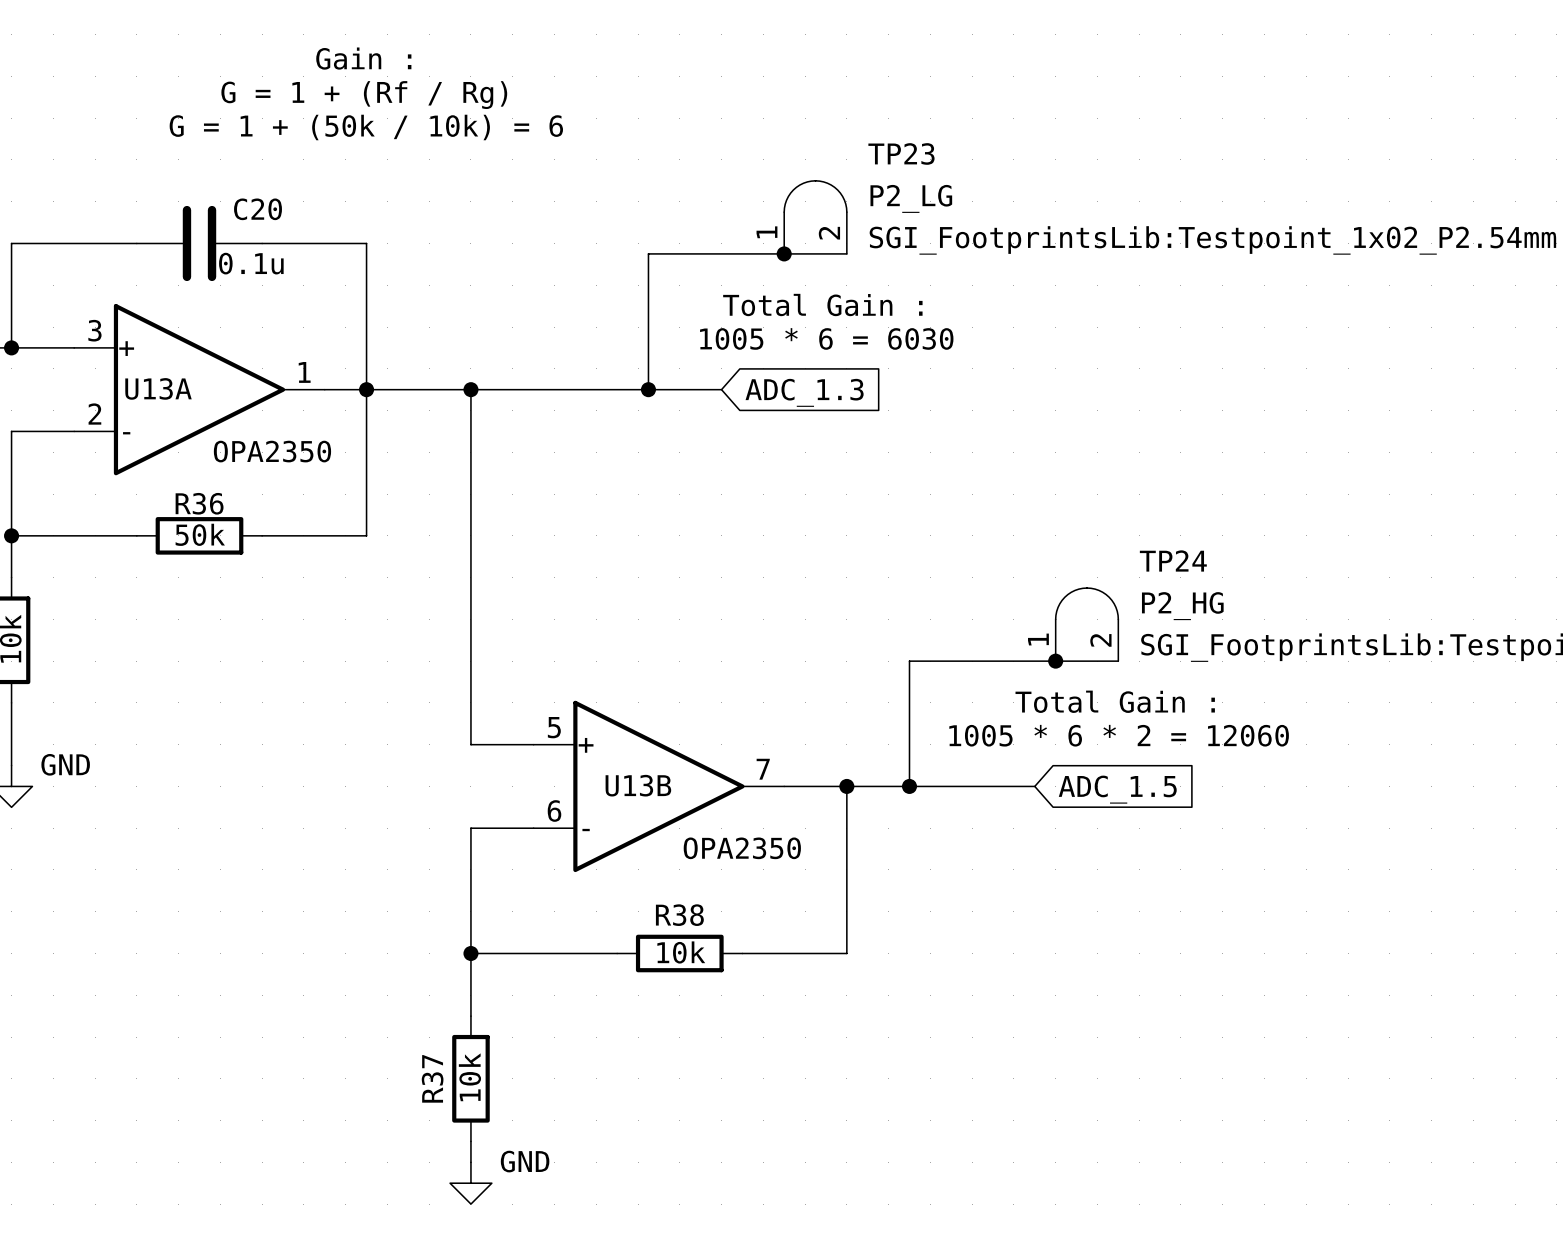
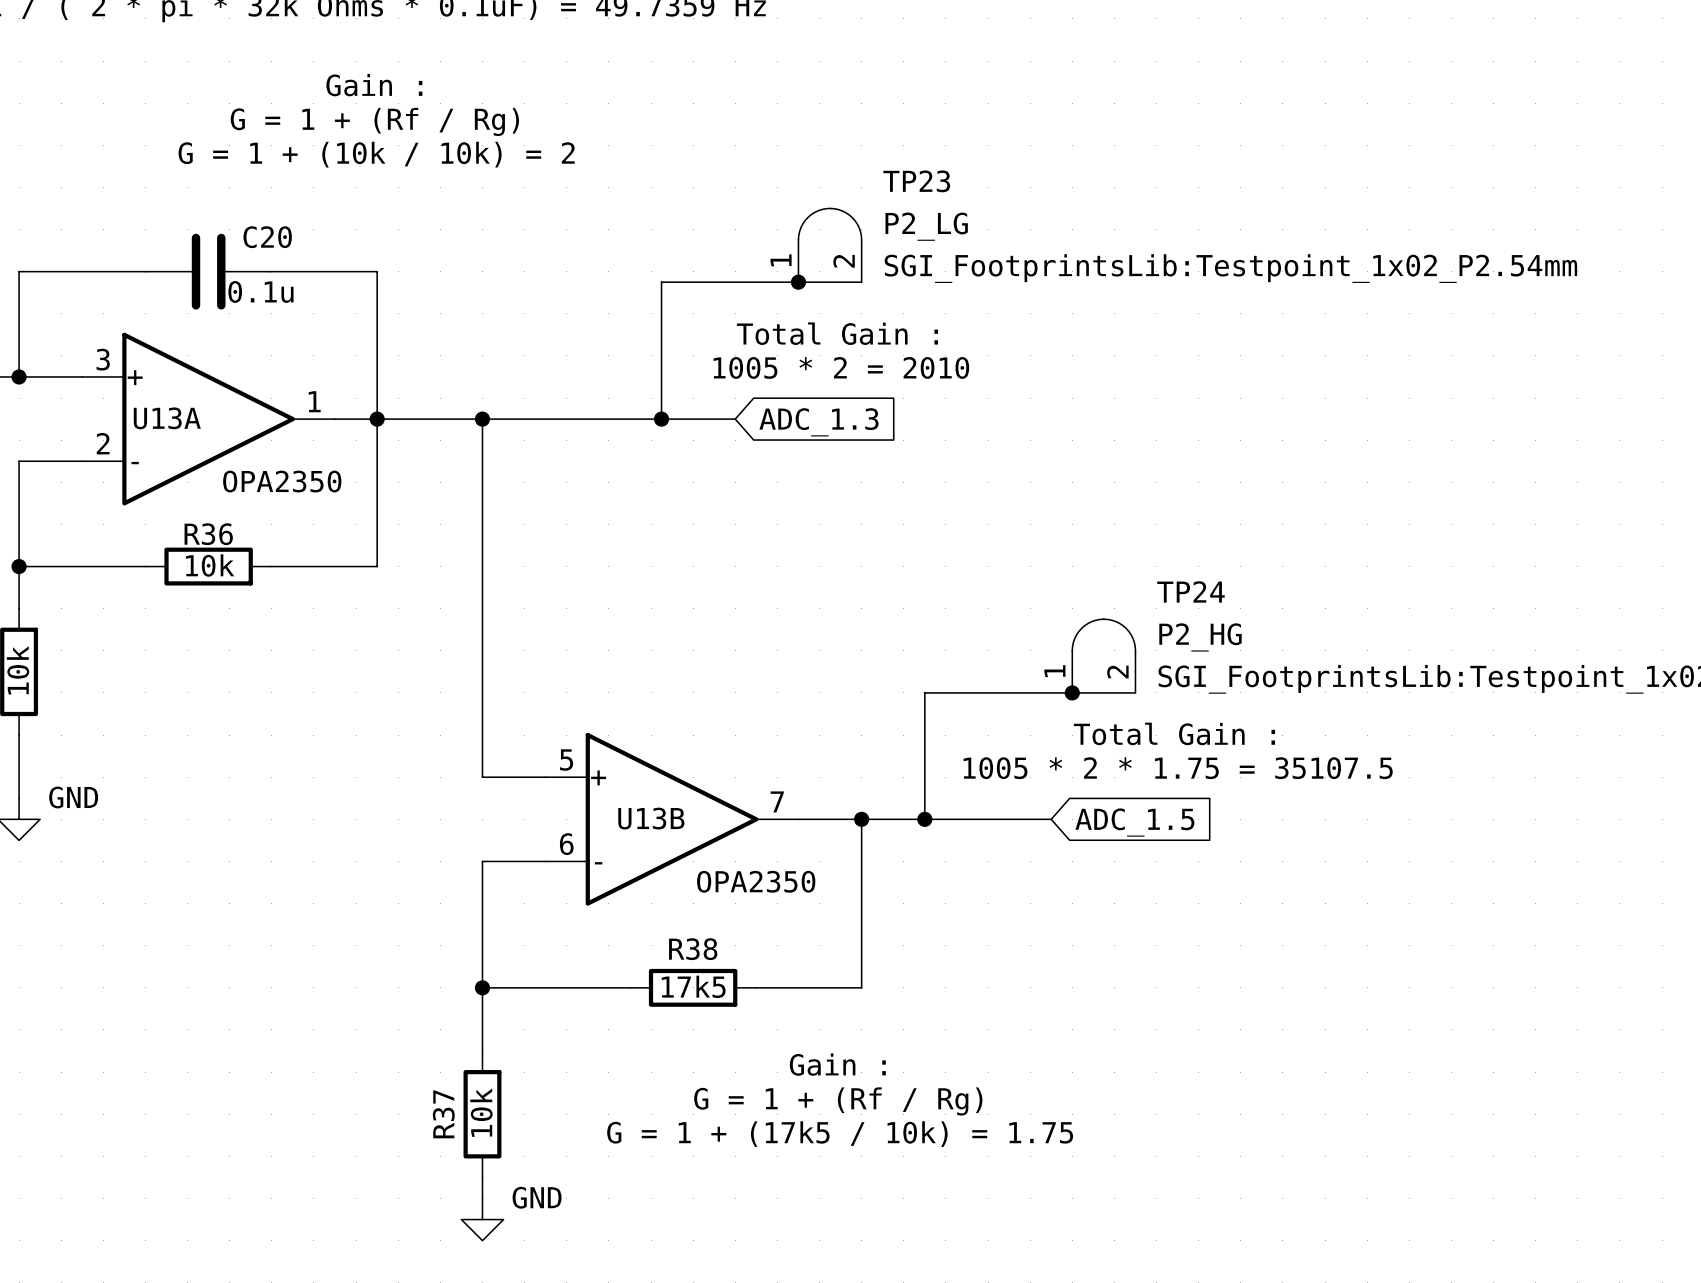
text: G = 1 + (50k / 10k) = 6 (366, 127) -> G = 1 + (10k / 10k) = 2 (376, 154)
text: 1005 * 6 = 6030 (826, 338) -> 1005 * 2 = 2010 (841, 367)
R36 value: 50k (200, 534) -> 10k (210, 565)
text position: Total Gain : (1115, 701) -> Total Gain : (1174, 733)
text: 1005 * 6 * 2 = 12060 (1119, 735) -> 1005 * 2 * 1.75 = 35107.5 (1178, 768)
R38 value: 10k (681, 952) -> 17k5 (693, 986)
text: none -> Gain : (837, 1064)
text: none -> G = 1 + (Rf / Rg) (838, 1101)
text: none -> G = 1 + (17k5 / 10k) = 1.75 (840, 1134)

